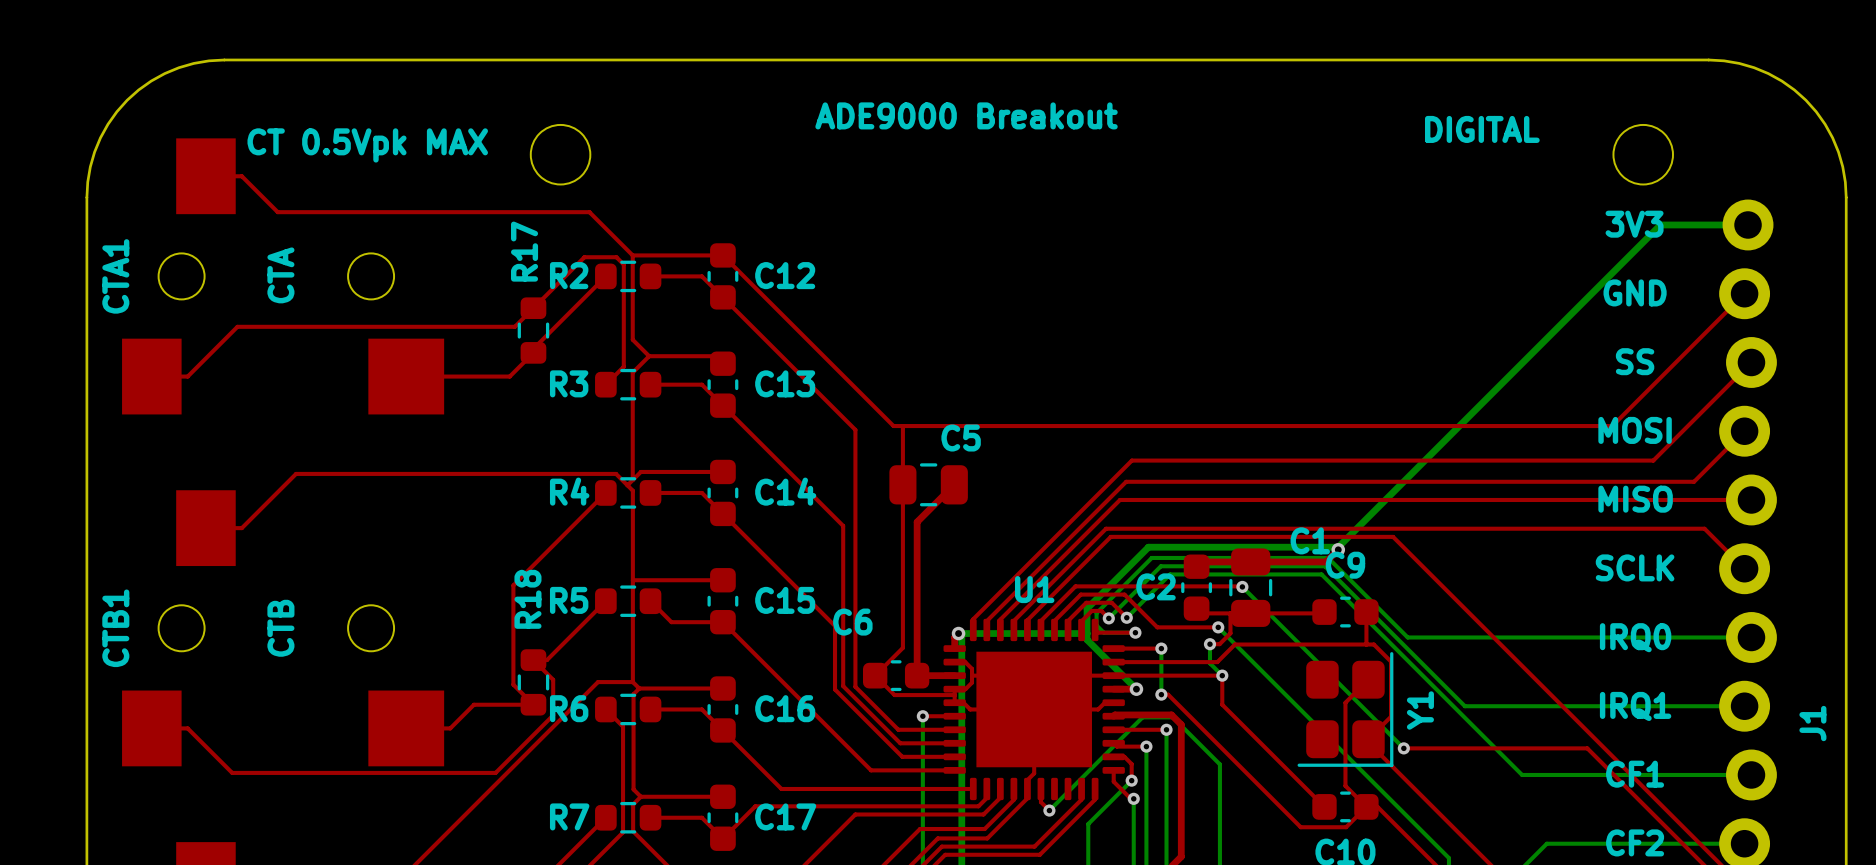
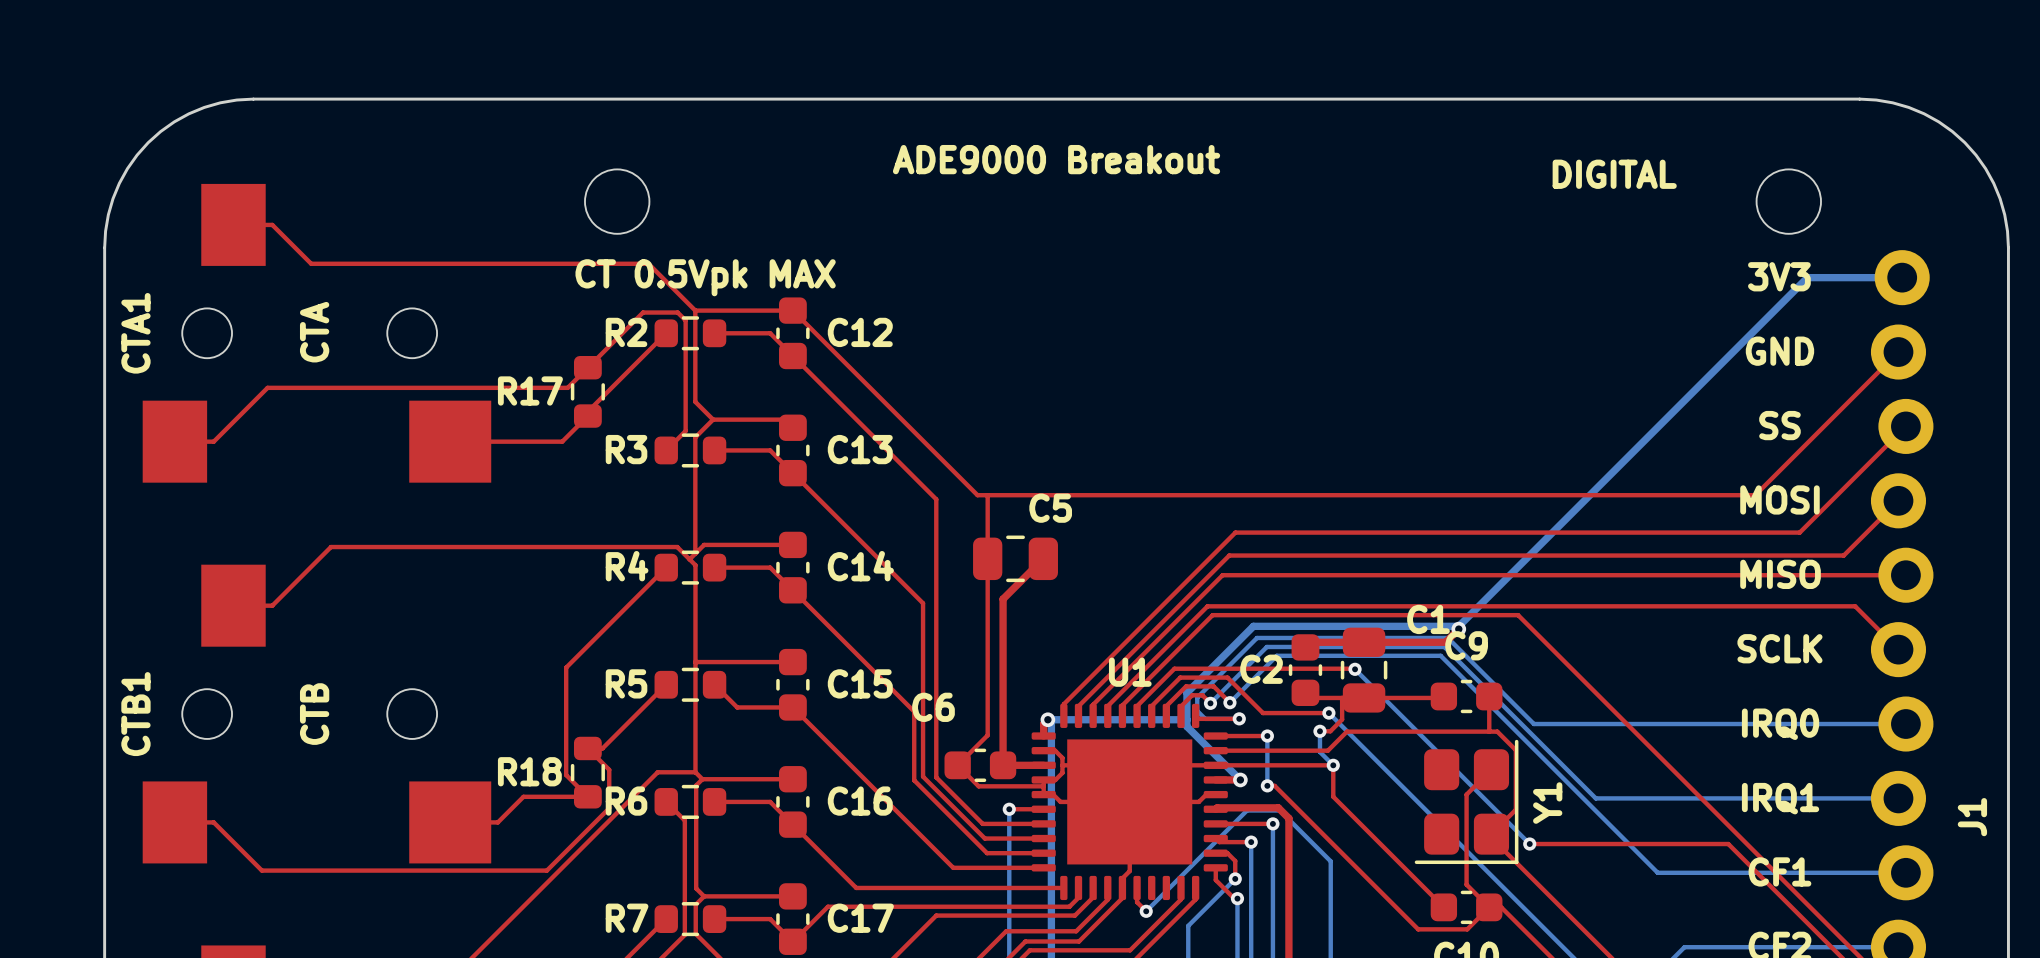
text position: CT 0.5Vpk MAX (367, 145) -> CT 0.5Vpk MAX (705, 277)
R17 name rotation: 0° (524, 251) -> 90° clockwise (530, 391)
R17 name position: R17 (524, 251) -> R17 (530, 391)
R18 name rotation: 0° (527, 599) -> 90° clockwise (529, 771)
R18 name position: R18 (527, 599) -> R18 (529, 771)

